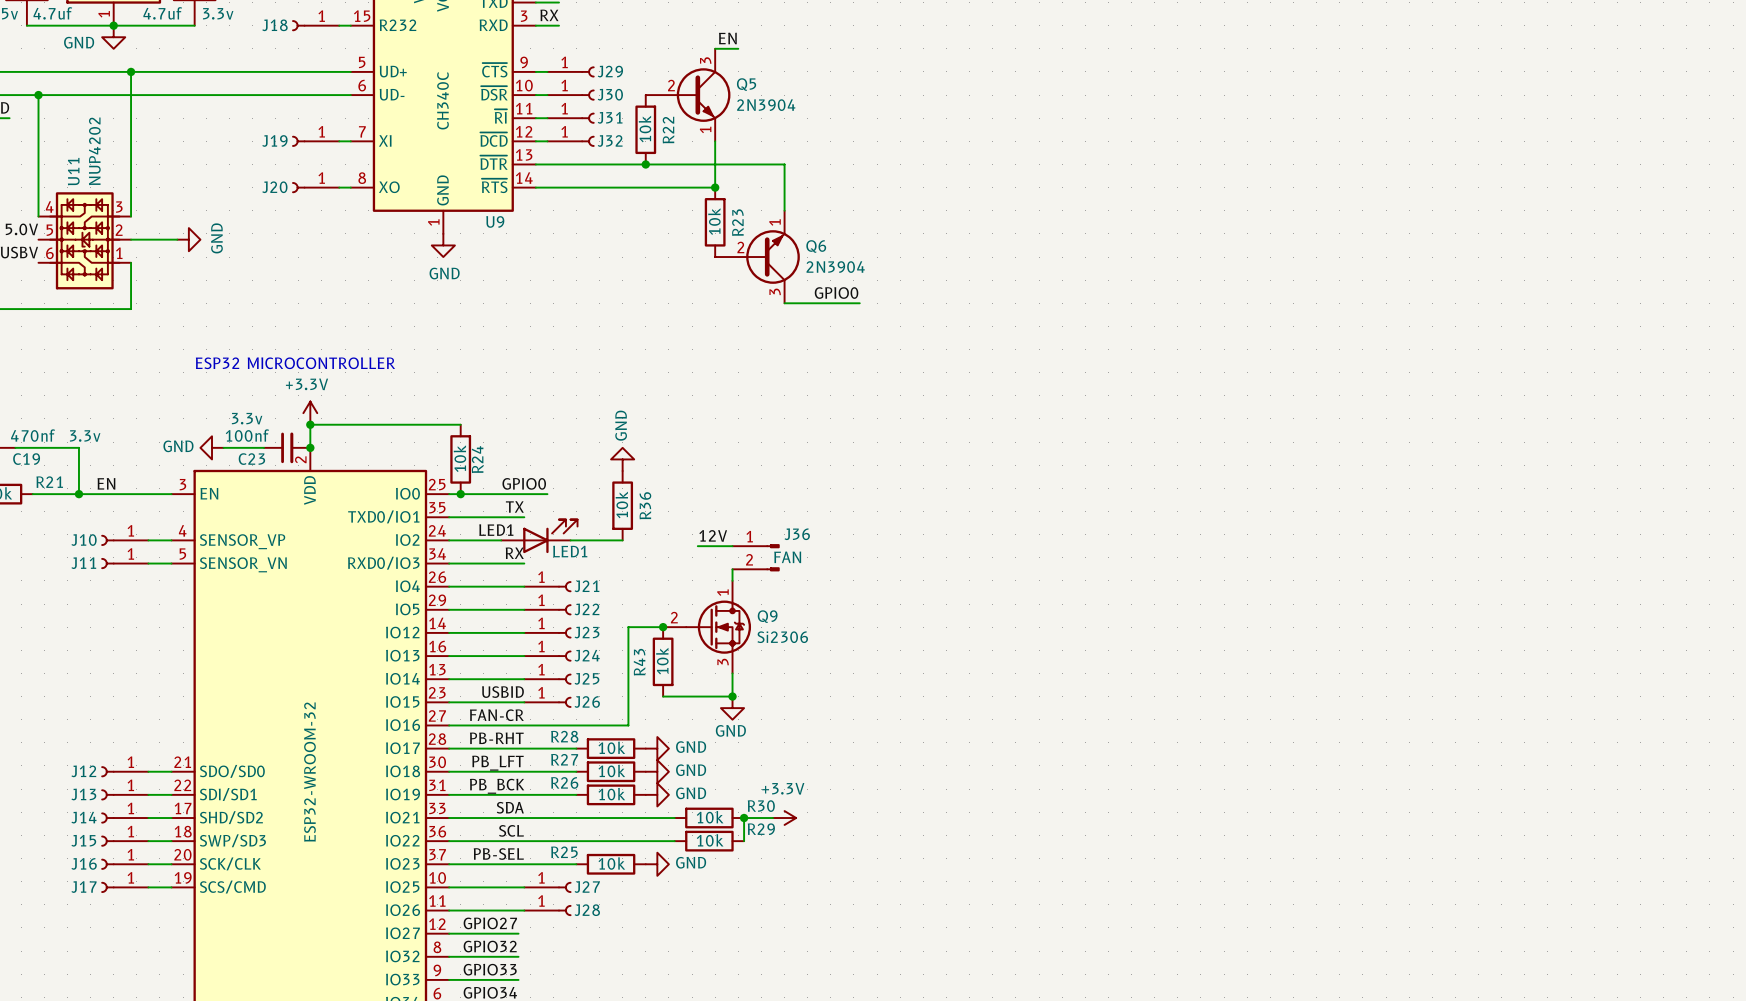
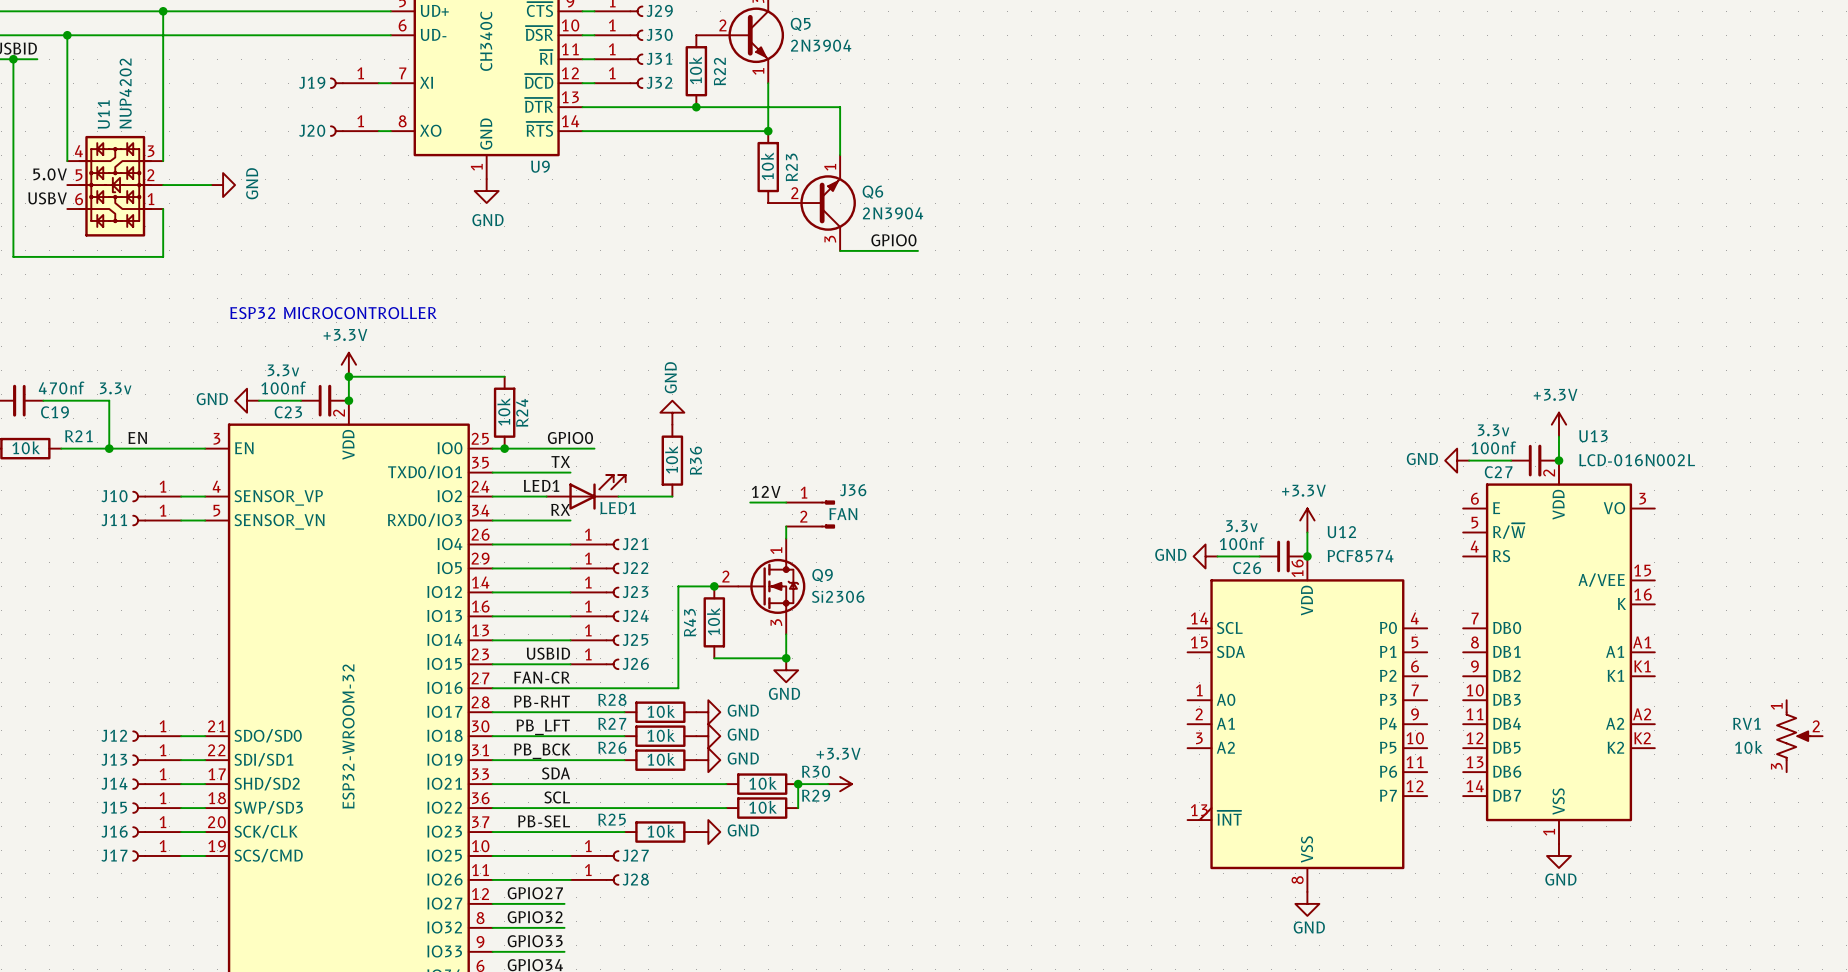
power symbol: none -> +3.3V (1558, 424)
wire: none -> (1558, 436) (1558, 460)
power symbol: none -> GND (1457, 460)
wire: none -> (1469, 460) (1511, 460)
C27: none -> 100nf (1535, 460)
junction: none -> (1558, 460)
power symbol: none -> +3.3V (1307, 520)
wire: none -> (1307, 532) (1307, 556)
power symbol: none -> GND (1205, 556)
wire: none -> (1217, 556) (1259, 556)
C26: none -> 100nf (1283, 556)
junction: none -> (1307, 556)
U13: none -> LCD-016N002L (1558, 652)
U12: none -> PCF8574 (1307, 724)
RV1: none -> 10k (1799, 736)
power symbol: none -> GND (1558, 855)
power symbol: none -> GND (1307, 903)

